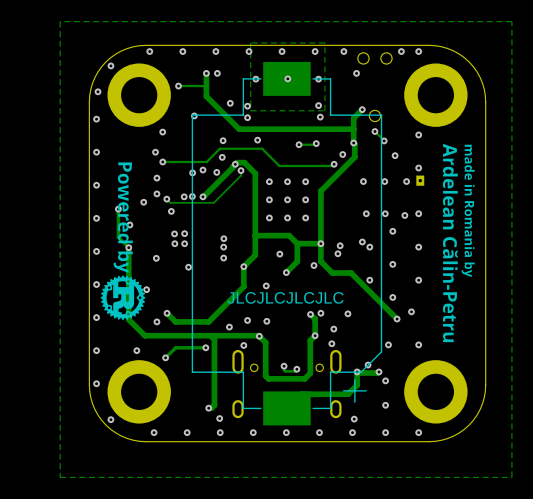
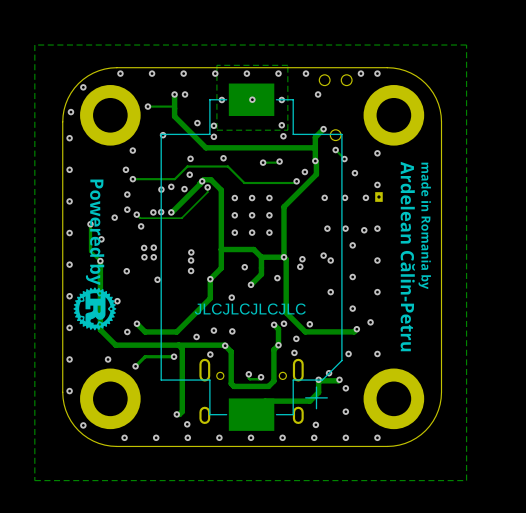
track: (320, 243) (320, 261) (332, 273) (351, 273) (397, 319) -> (283, 257) (286, 259) (286, 312) (305, 331) (354, 331) (356, 329)

